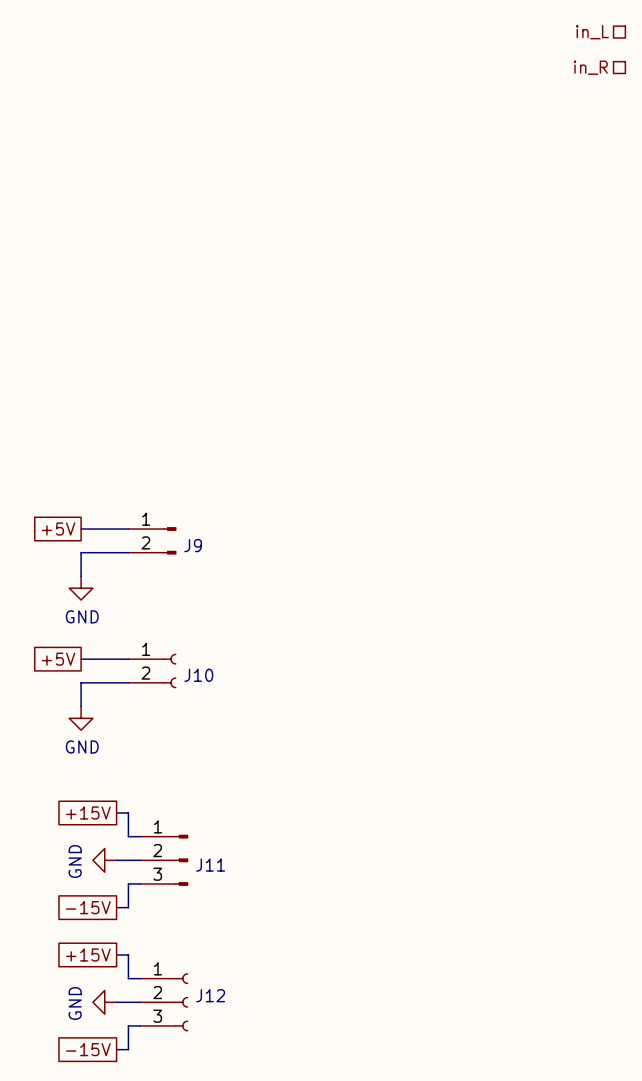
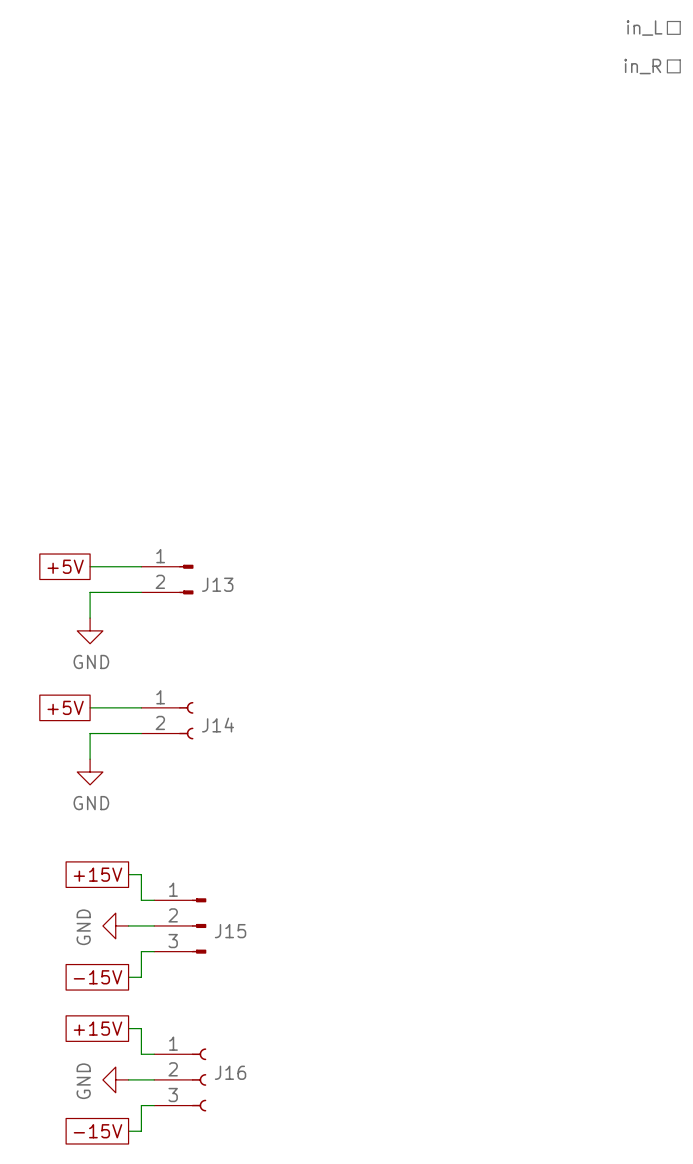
J9 name: J9 (193, 545) -> J13 (217, 584)
J10 name: J10 (198, 675) -> J14 (218, 725)
J11 name: J11 (210, 865) -> J15 (230, 931)
J12 name: J12 (210, 995) -> J16 (230, 1072)

